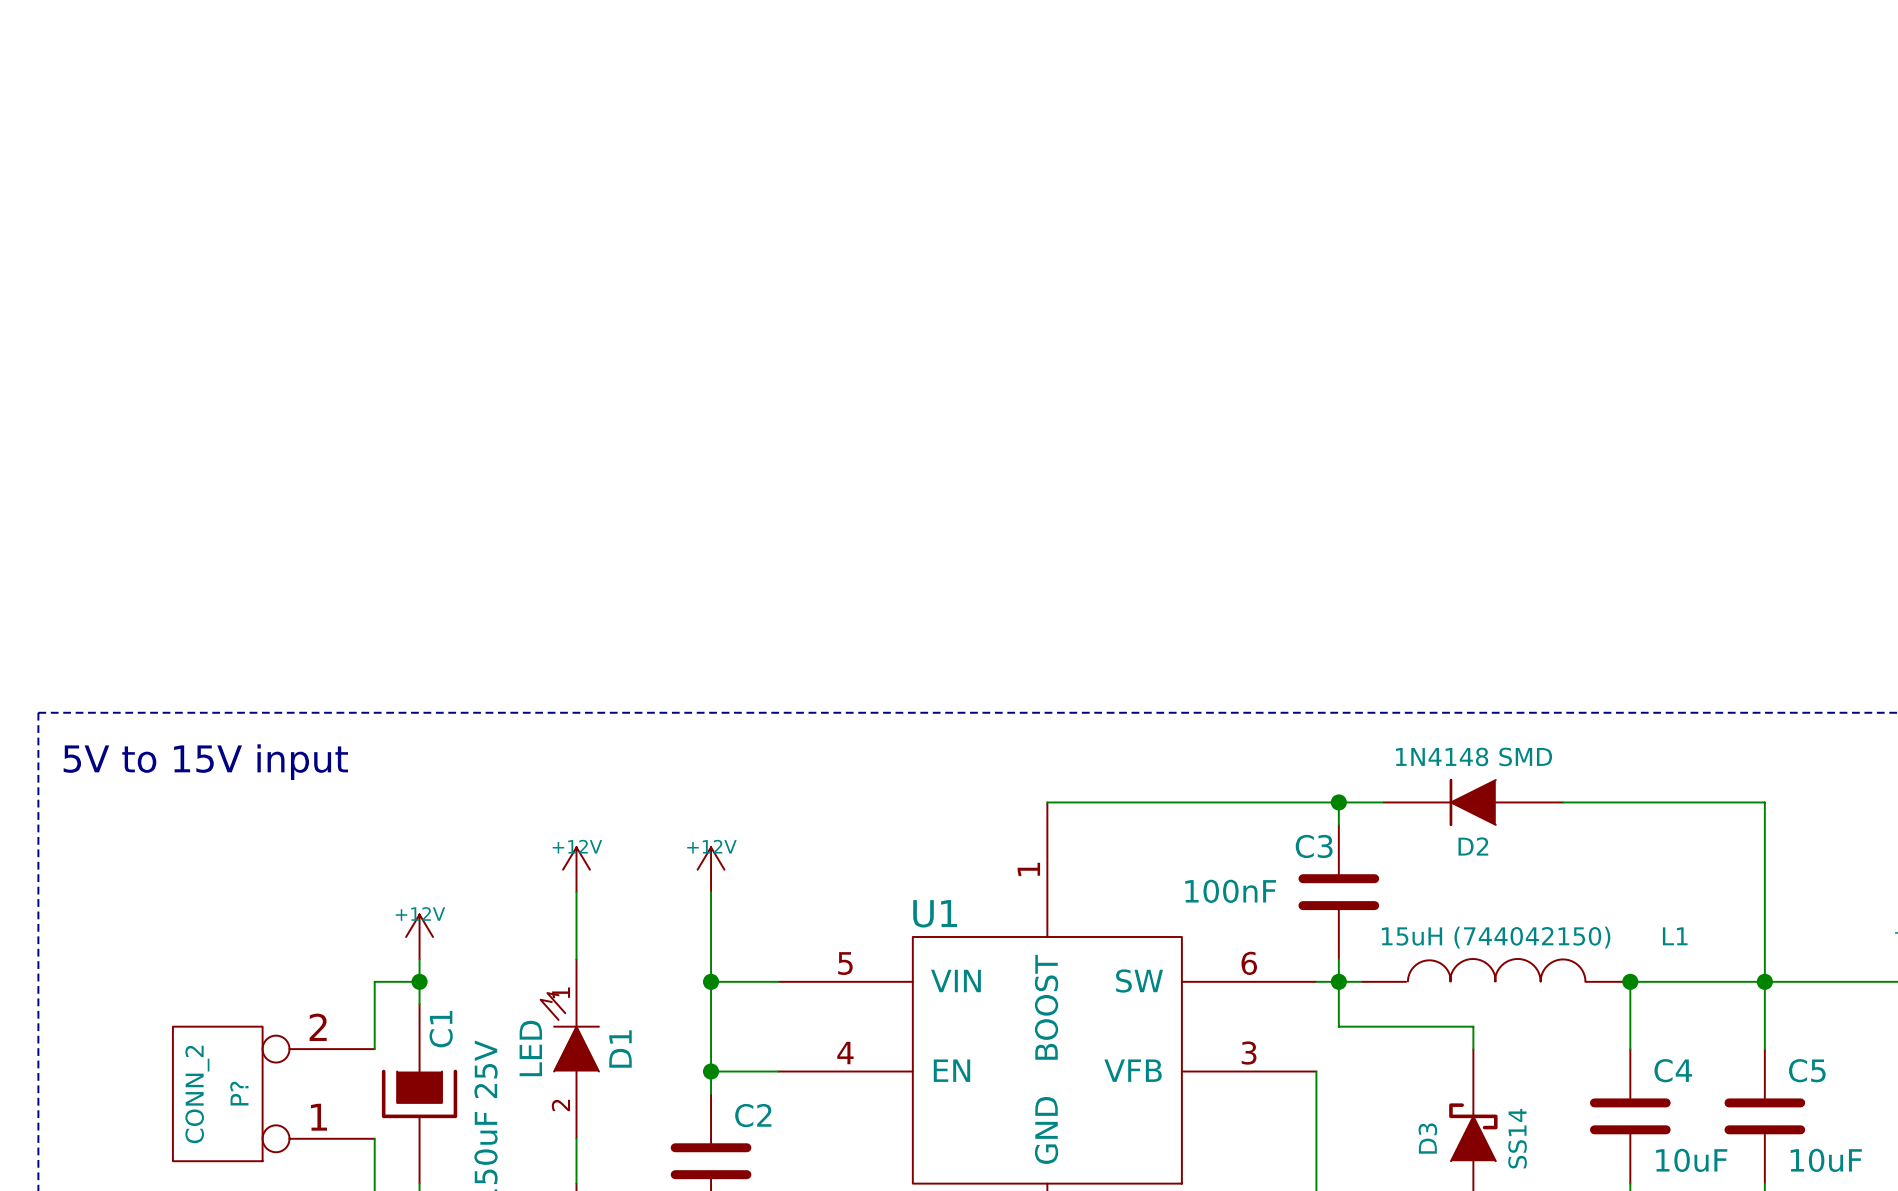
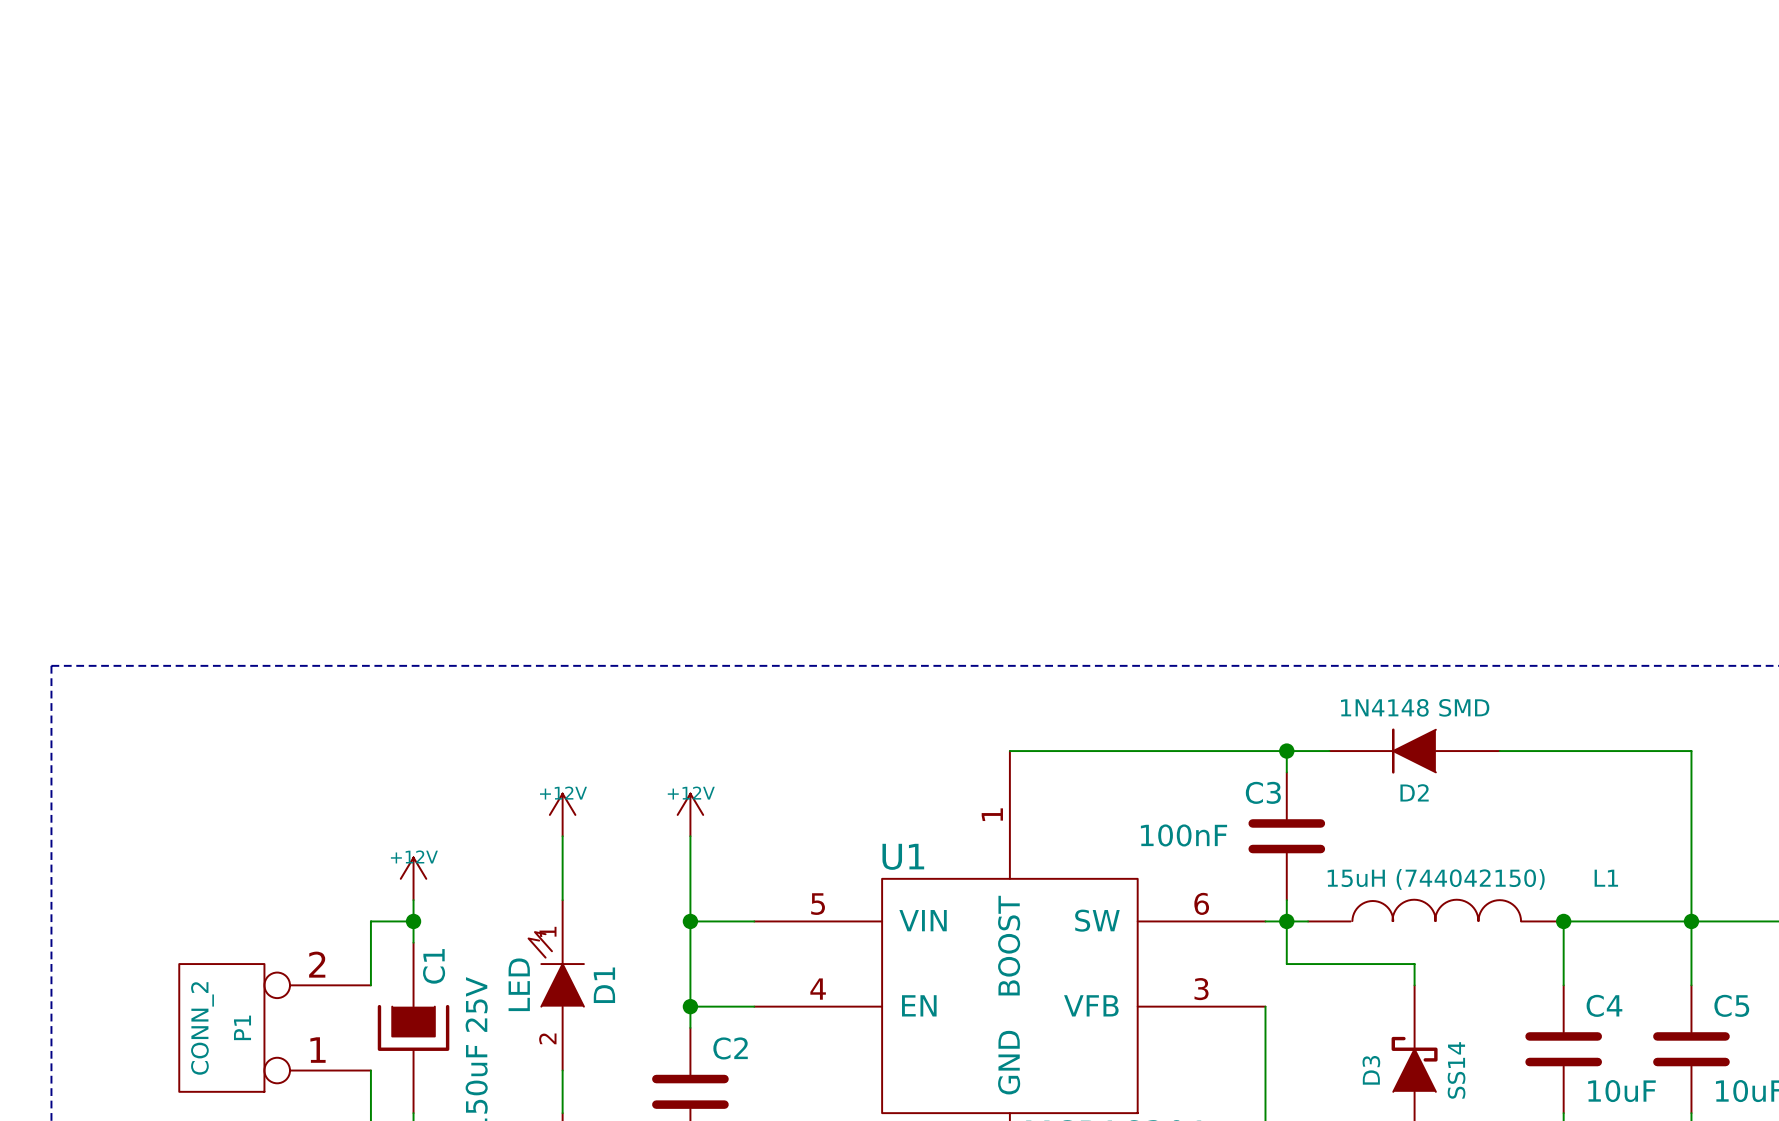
text: 5V to 15V input (205, 762) -> none
P? name: P? (239, 1093) -> P1 (242, 1027)

